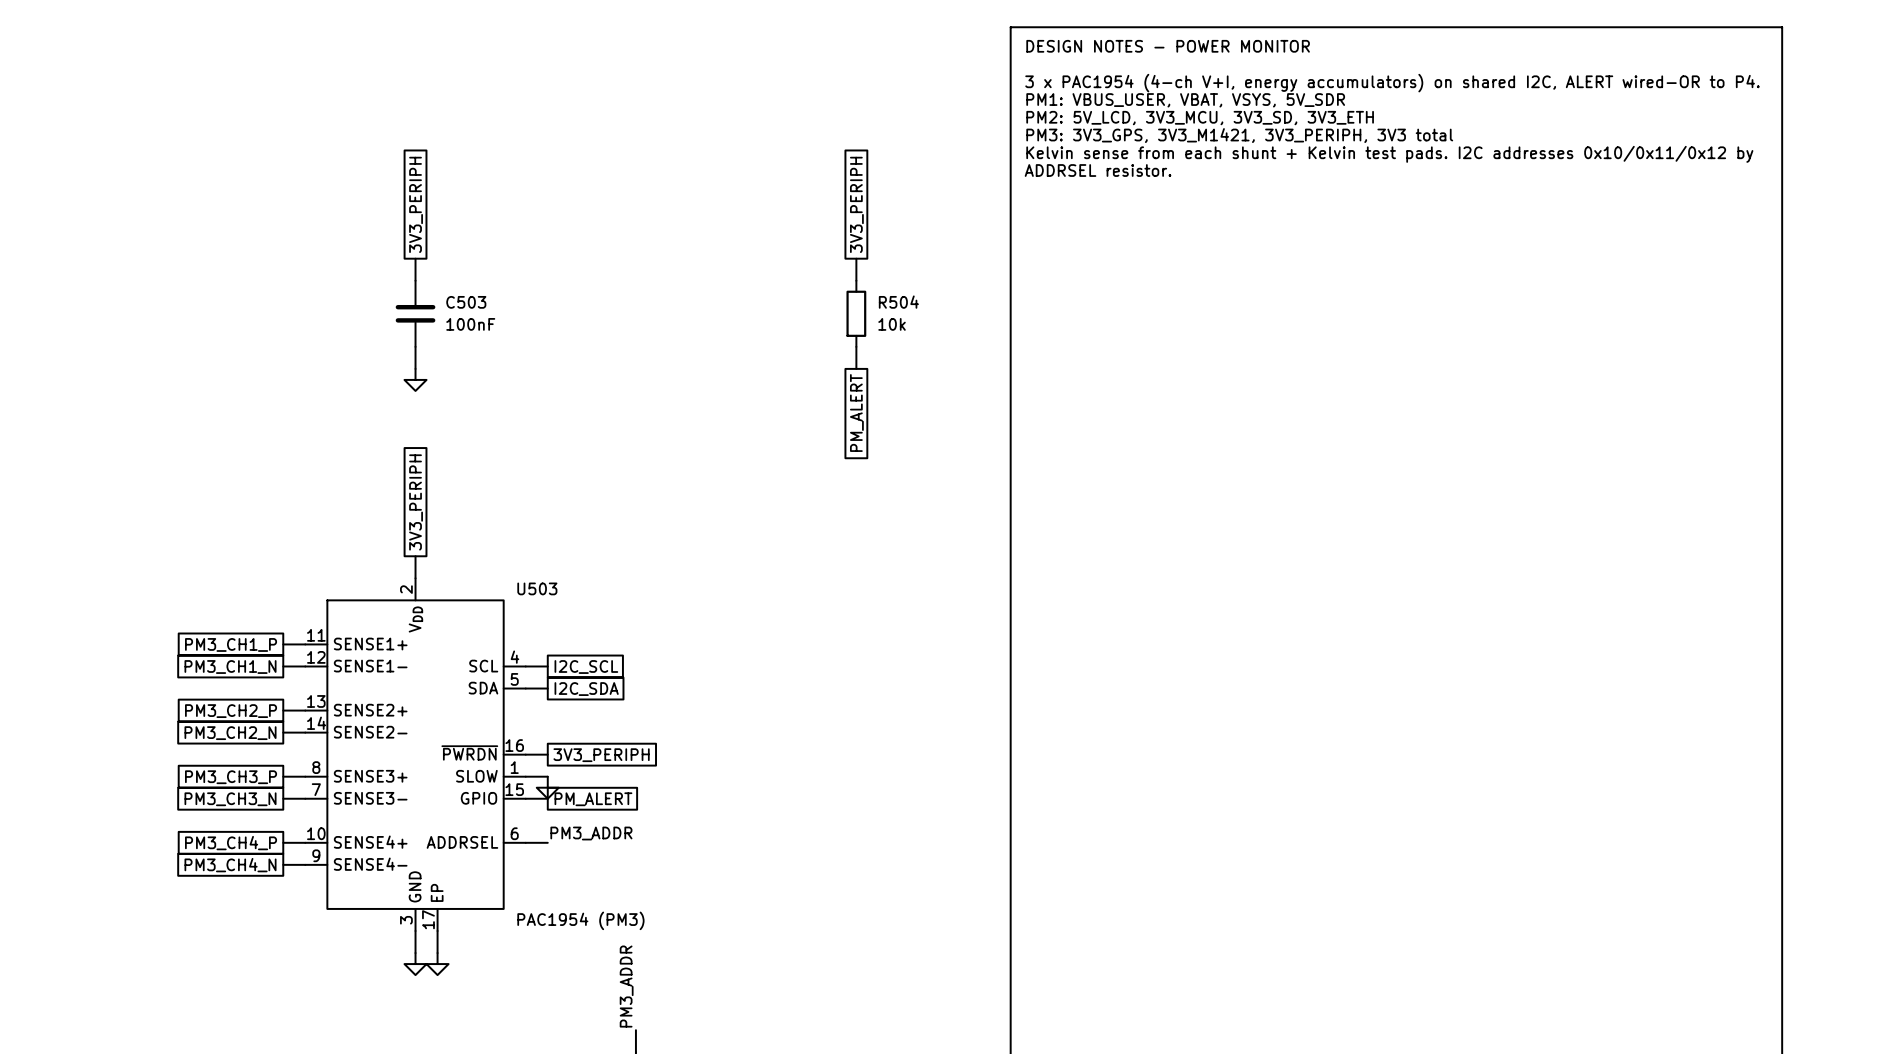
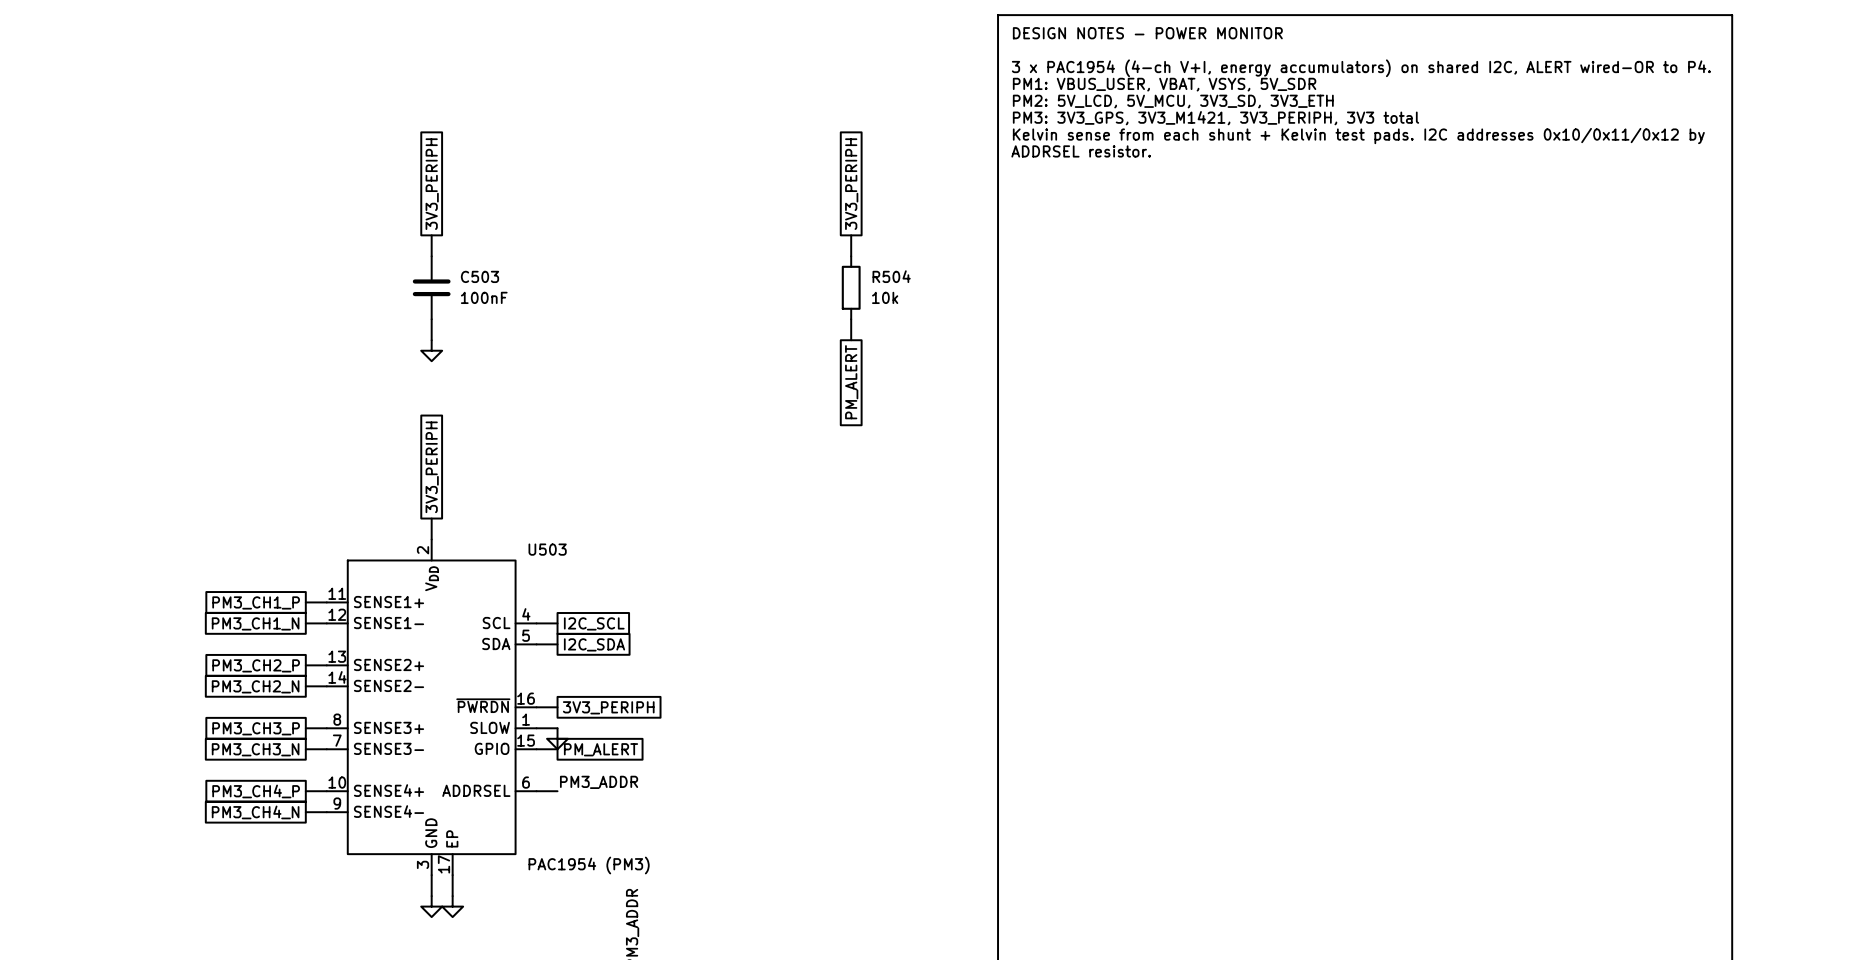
text: PM2: 5V_LCD, 3V3_MCU, 3V3_SD, 3V3_ETH (1200, 118) -> PM2: 5V_LCD, 5V_MCU, 3V3_SD, 3V3_ETH (1173, 101)

